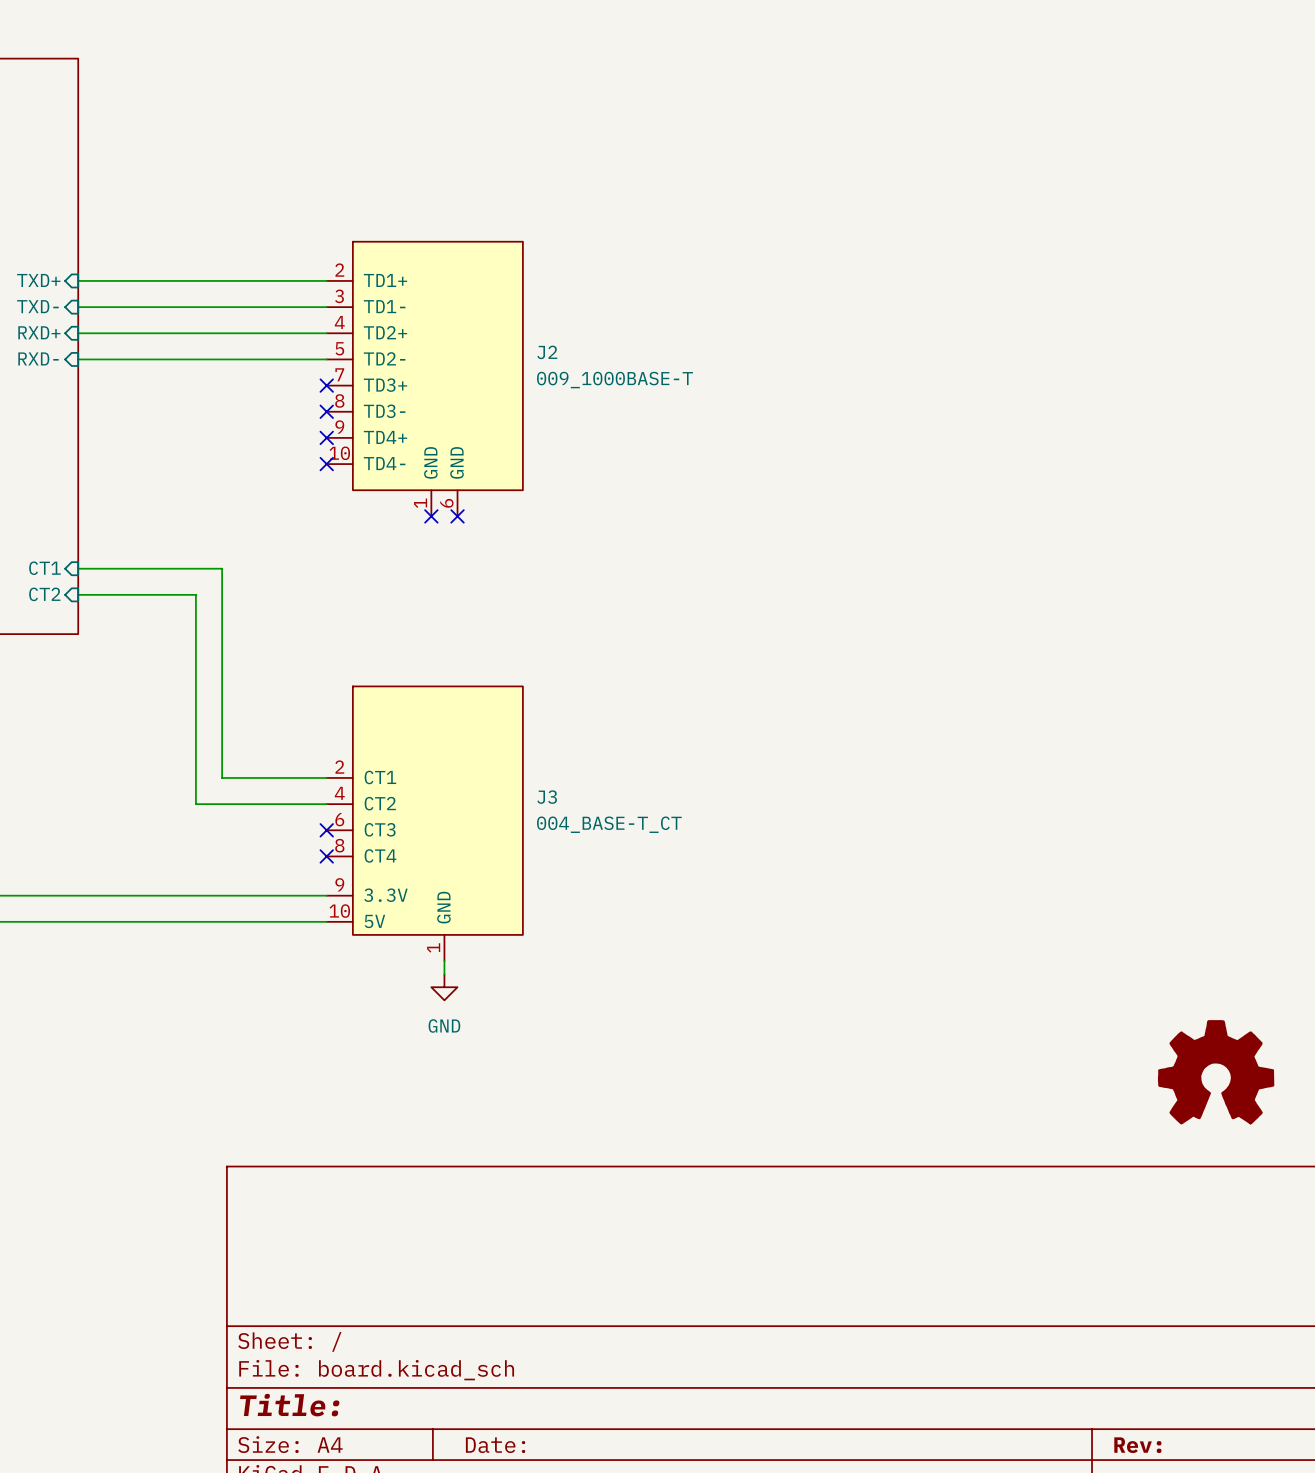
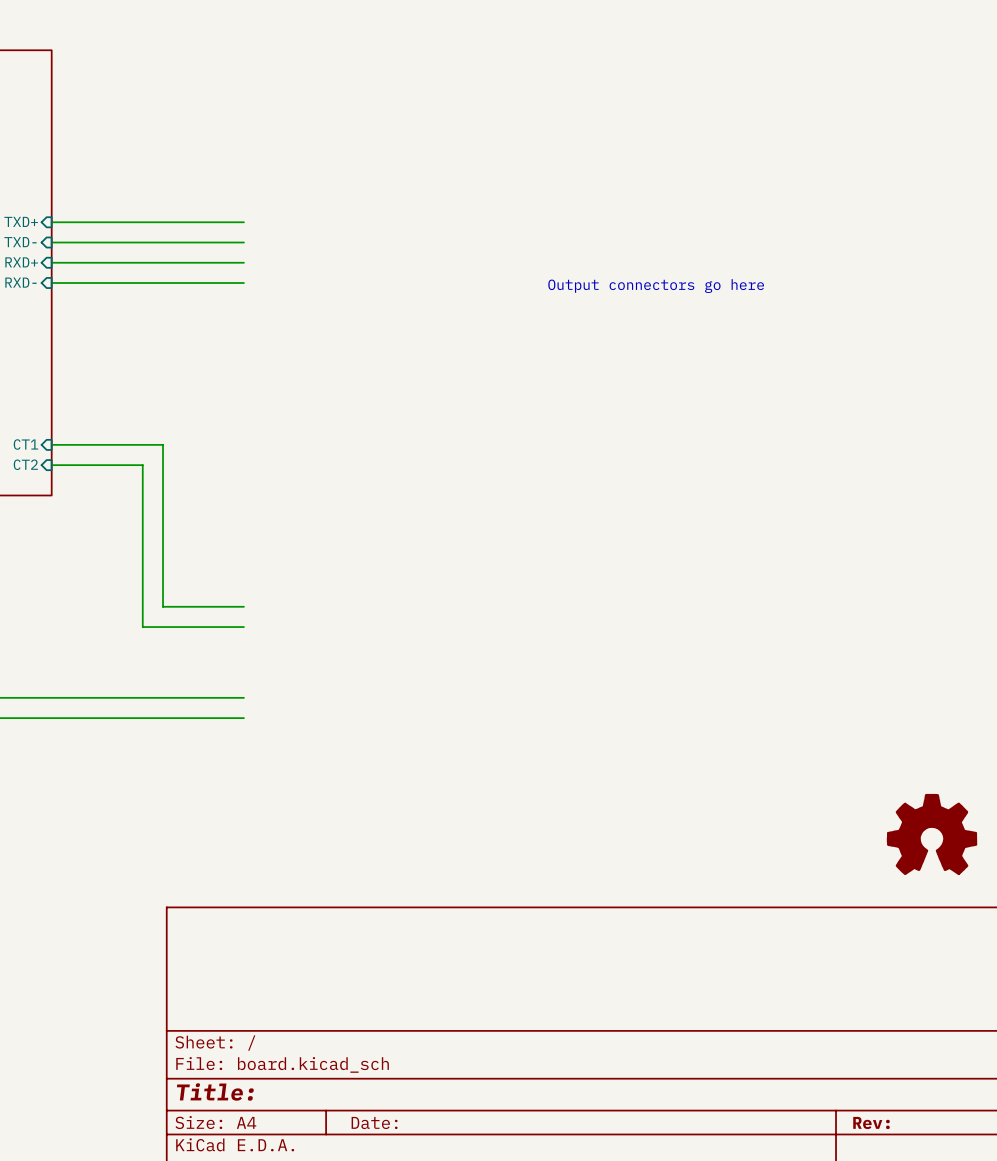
text: none -> Output connectors go here (656, 286)
J2: 009_1000BASE-T (424, 379) -> none
no-connect mark: (326, 385) -> none
no-connect mark: (326, 411) -> none
no-connect mark: (326, 437) -> none
no-connect mark: (326, 464) -> none
no-connect mark: (431, 516) -> none
no-connect mark: (457, 516) -> none
J3: 004_BASE-T_CT (424, 823) -> none
no-connect mark: (326, 830) -> none
no-connect mark: (326, 856) -> none
wire: (444, 961) (444, 974) -> none
power symbol: GND (444, 987) -> none

